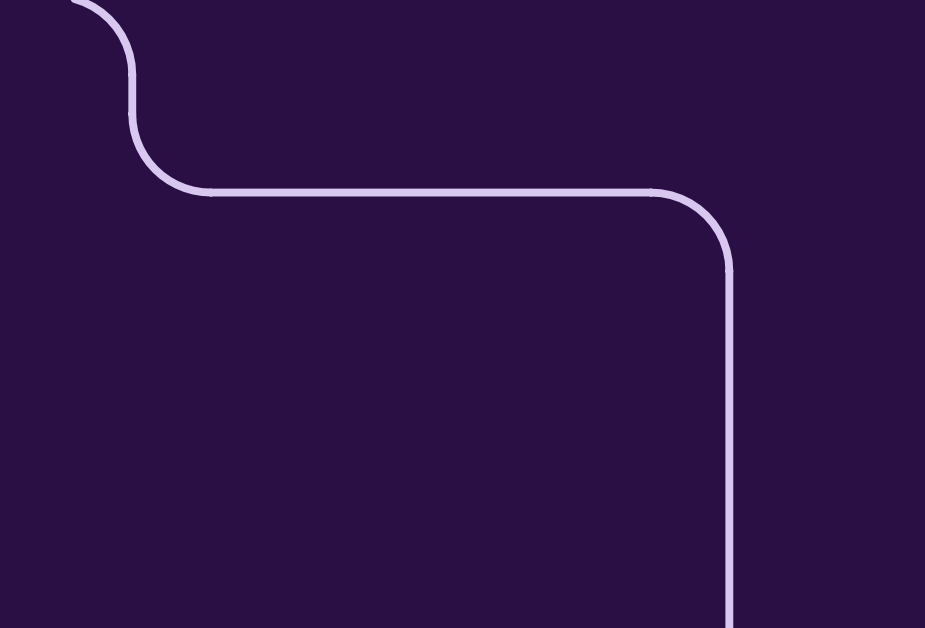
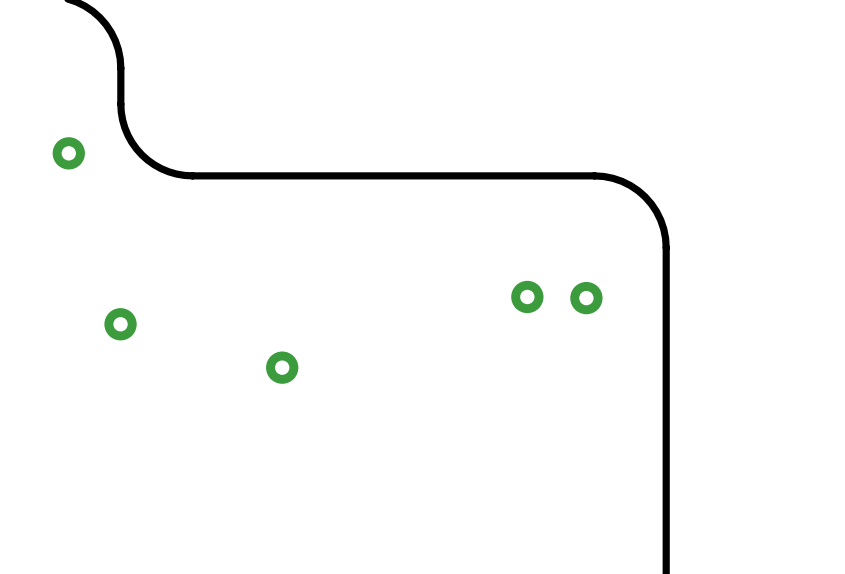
via: none -> (68, 153)
via: none -> (527, 296)
via: none -> (586, 298)
via: none -> (120, 324)
via: none -> (282, 367)

